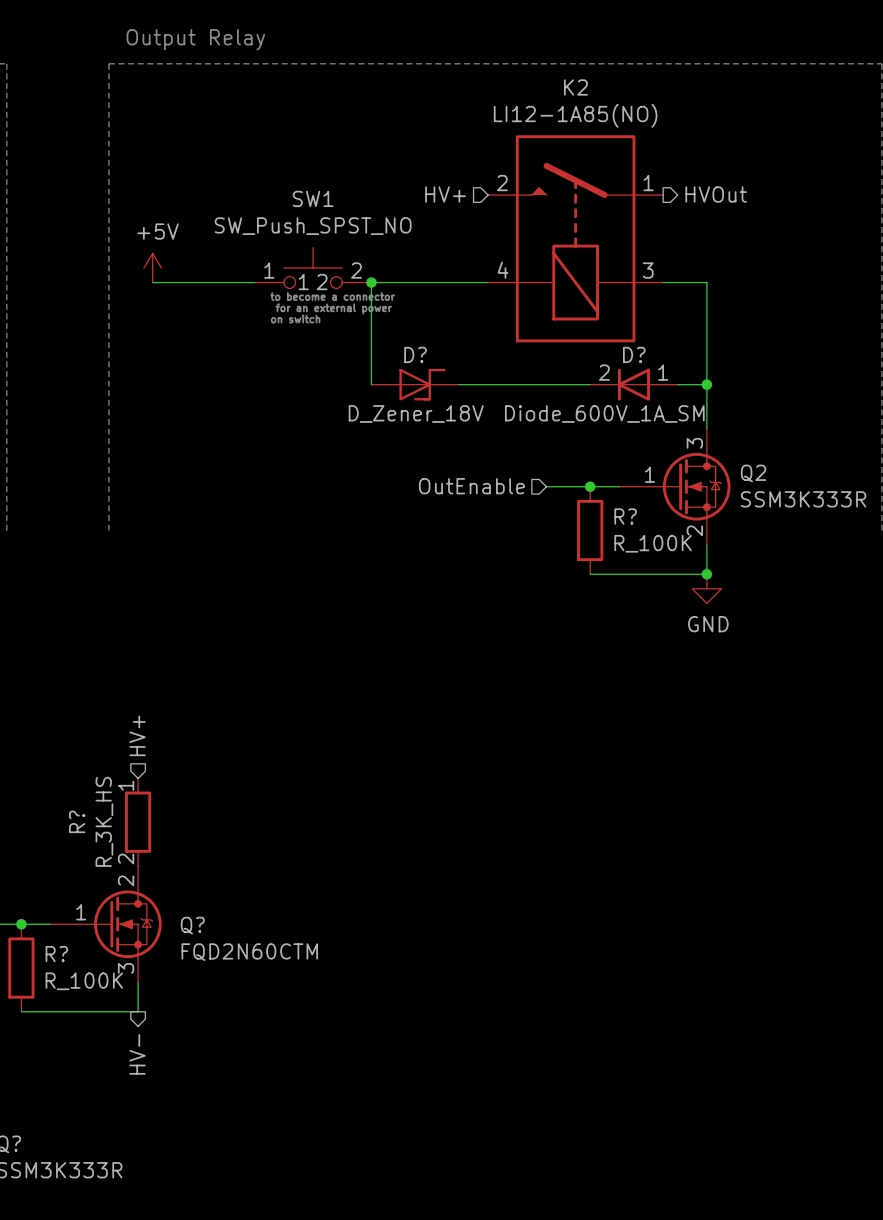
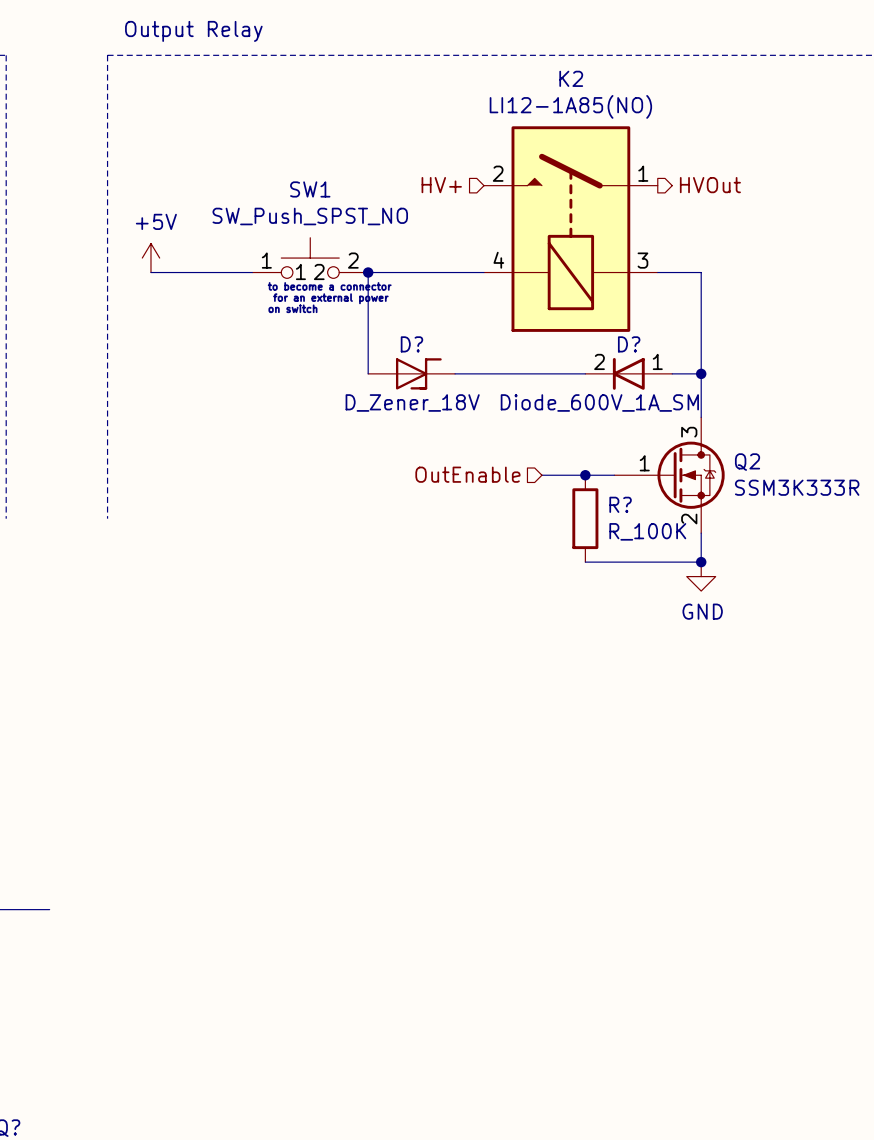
hierarchical label: HV+ (137, 735) -> none
R?: R_3K_HS (138, 822) -> none
junction: (21, 924) -> none
Q?: FQD2N60CTM (106, 924) -> none
R?: R_100K (21, 968) -> none
wire: (138, 982) (138, 1011) (21, 1011) -> none
hierarchical label: HV- (137, 1054) -> none

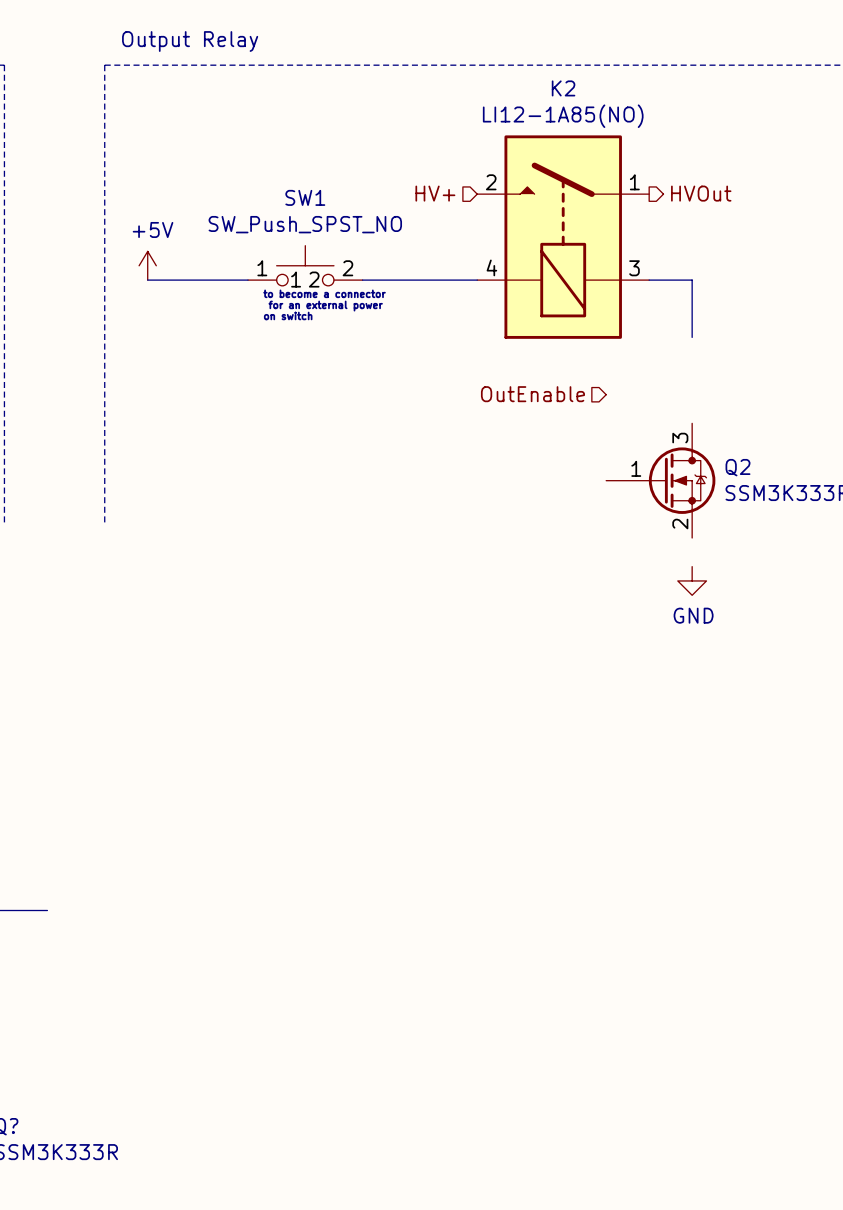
wire: (368, 272) (368, 373) -> none
junction: (368, 272) -> none
wire: (701, 330) (701, 417) -> none
D?: D_Zener_18V (411, 373) -> none
wire: (455, 373) (585, 373) -> none
D?: Diode_600V_1A_SM (628, 373) -> none
wire: (672, 373) (701, 373) -> none
junction: (701, 373) -> none
hierarchical label position: OutEnable (467, 474) -> OutEnable (532, 394)
wire: (541, 475) (614, 475) -> none
junction: (585, 475) -> none
R?: R_100K (585, 518) -> none
wire: (701, 533) (701, 562) (585, 562) -> none
junction: (701, 562) -> none

